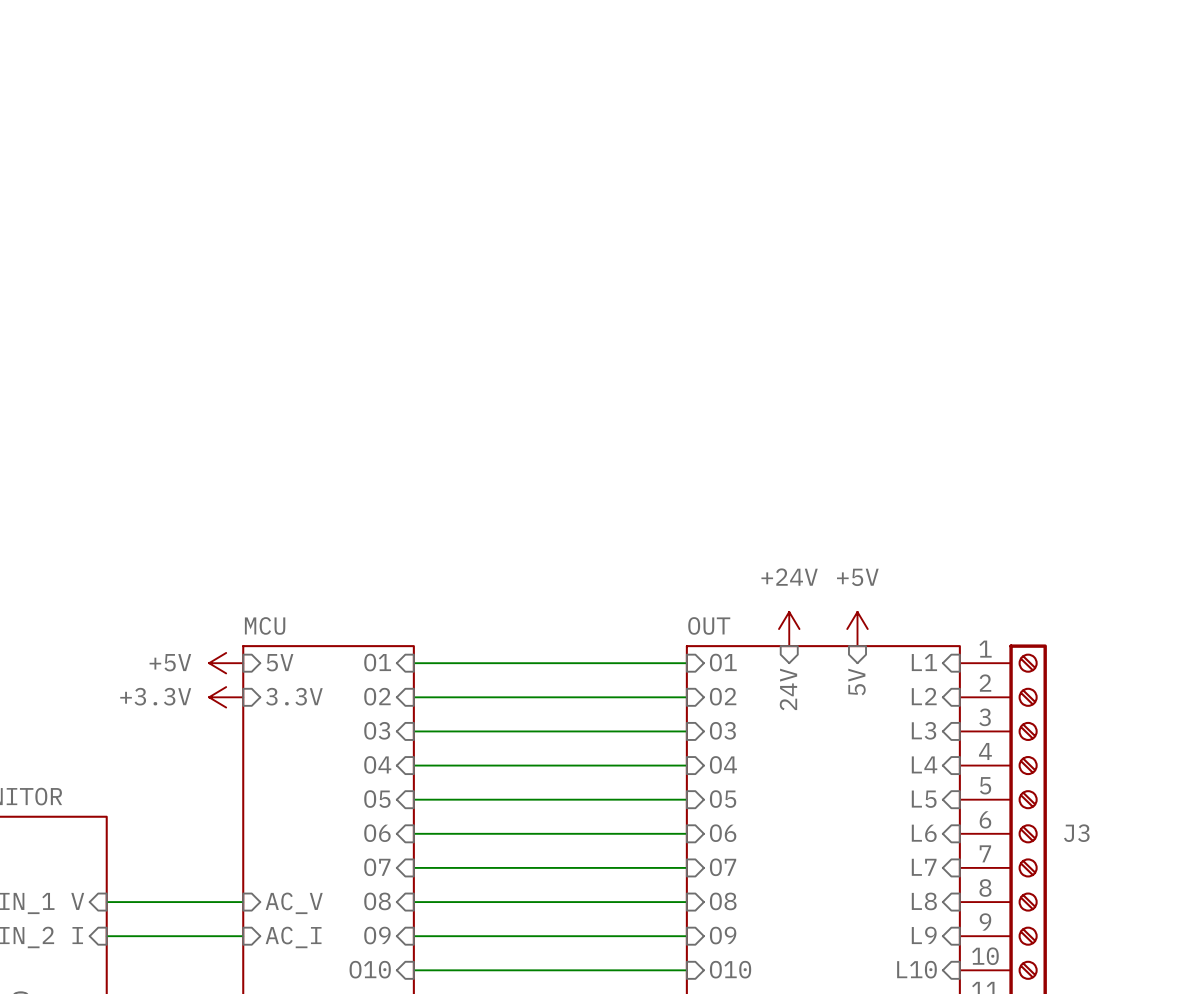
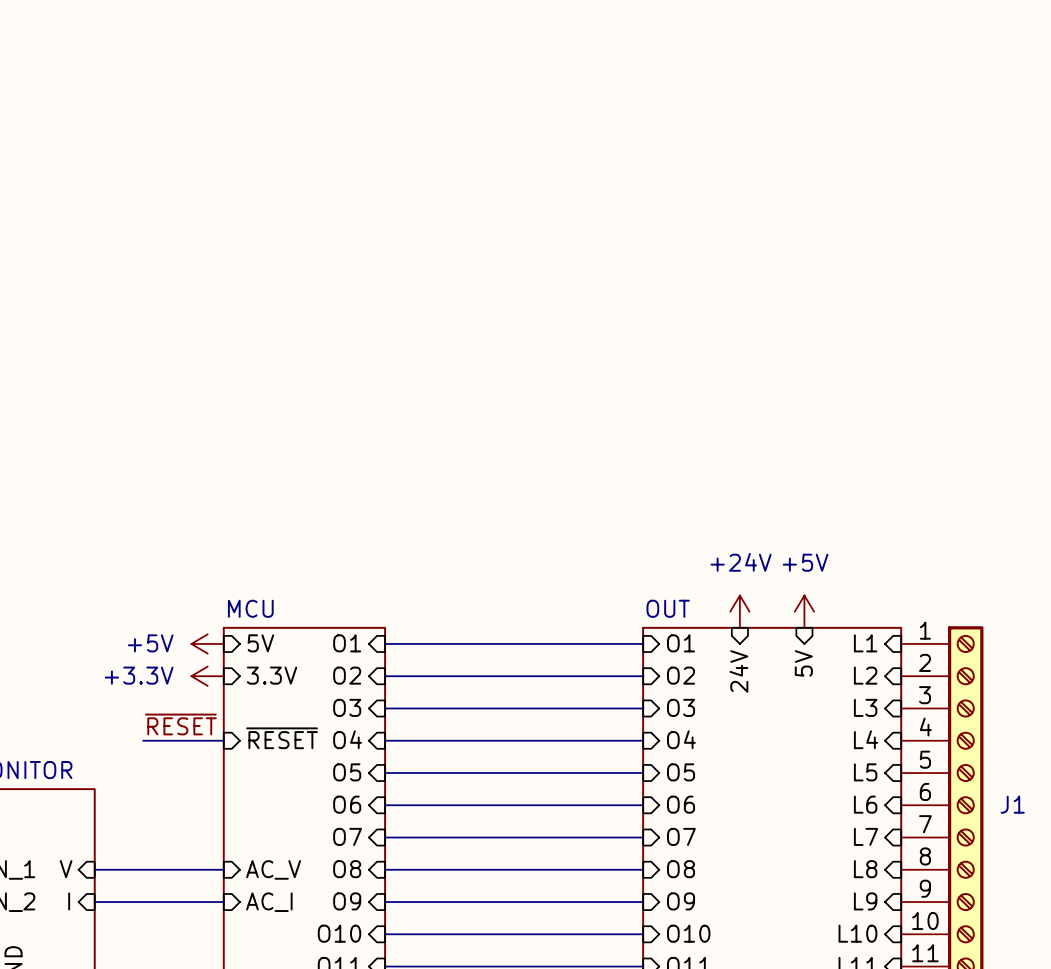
label: none -> ~{RESET} (180, 724)
sheet pin: none -> ~{RESET} (282, 738)
wire: none -> (143, 740) (223, 740)
J3 name: J3 (1076, 833) -> J1 (1012, 804)

